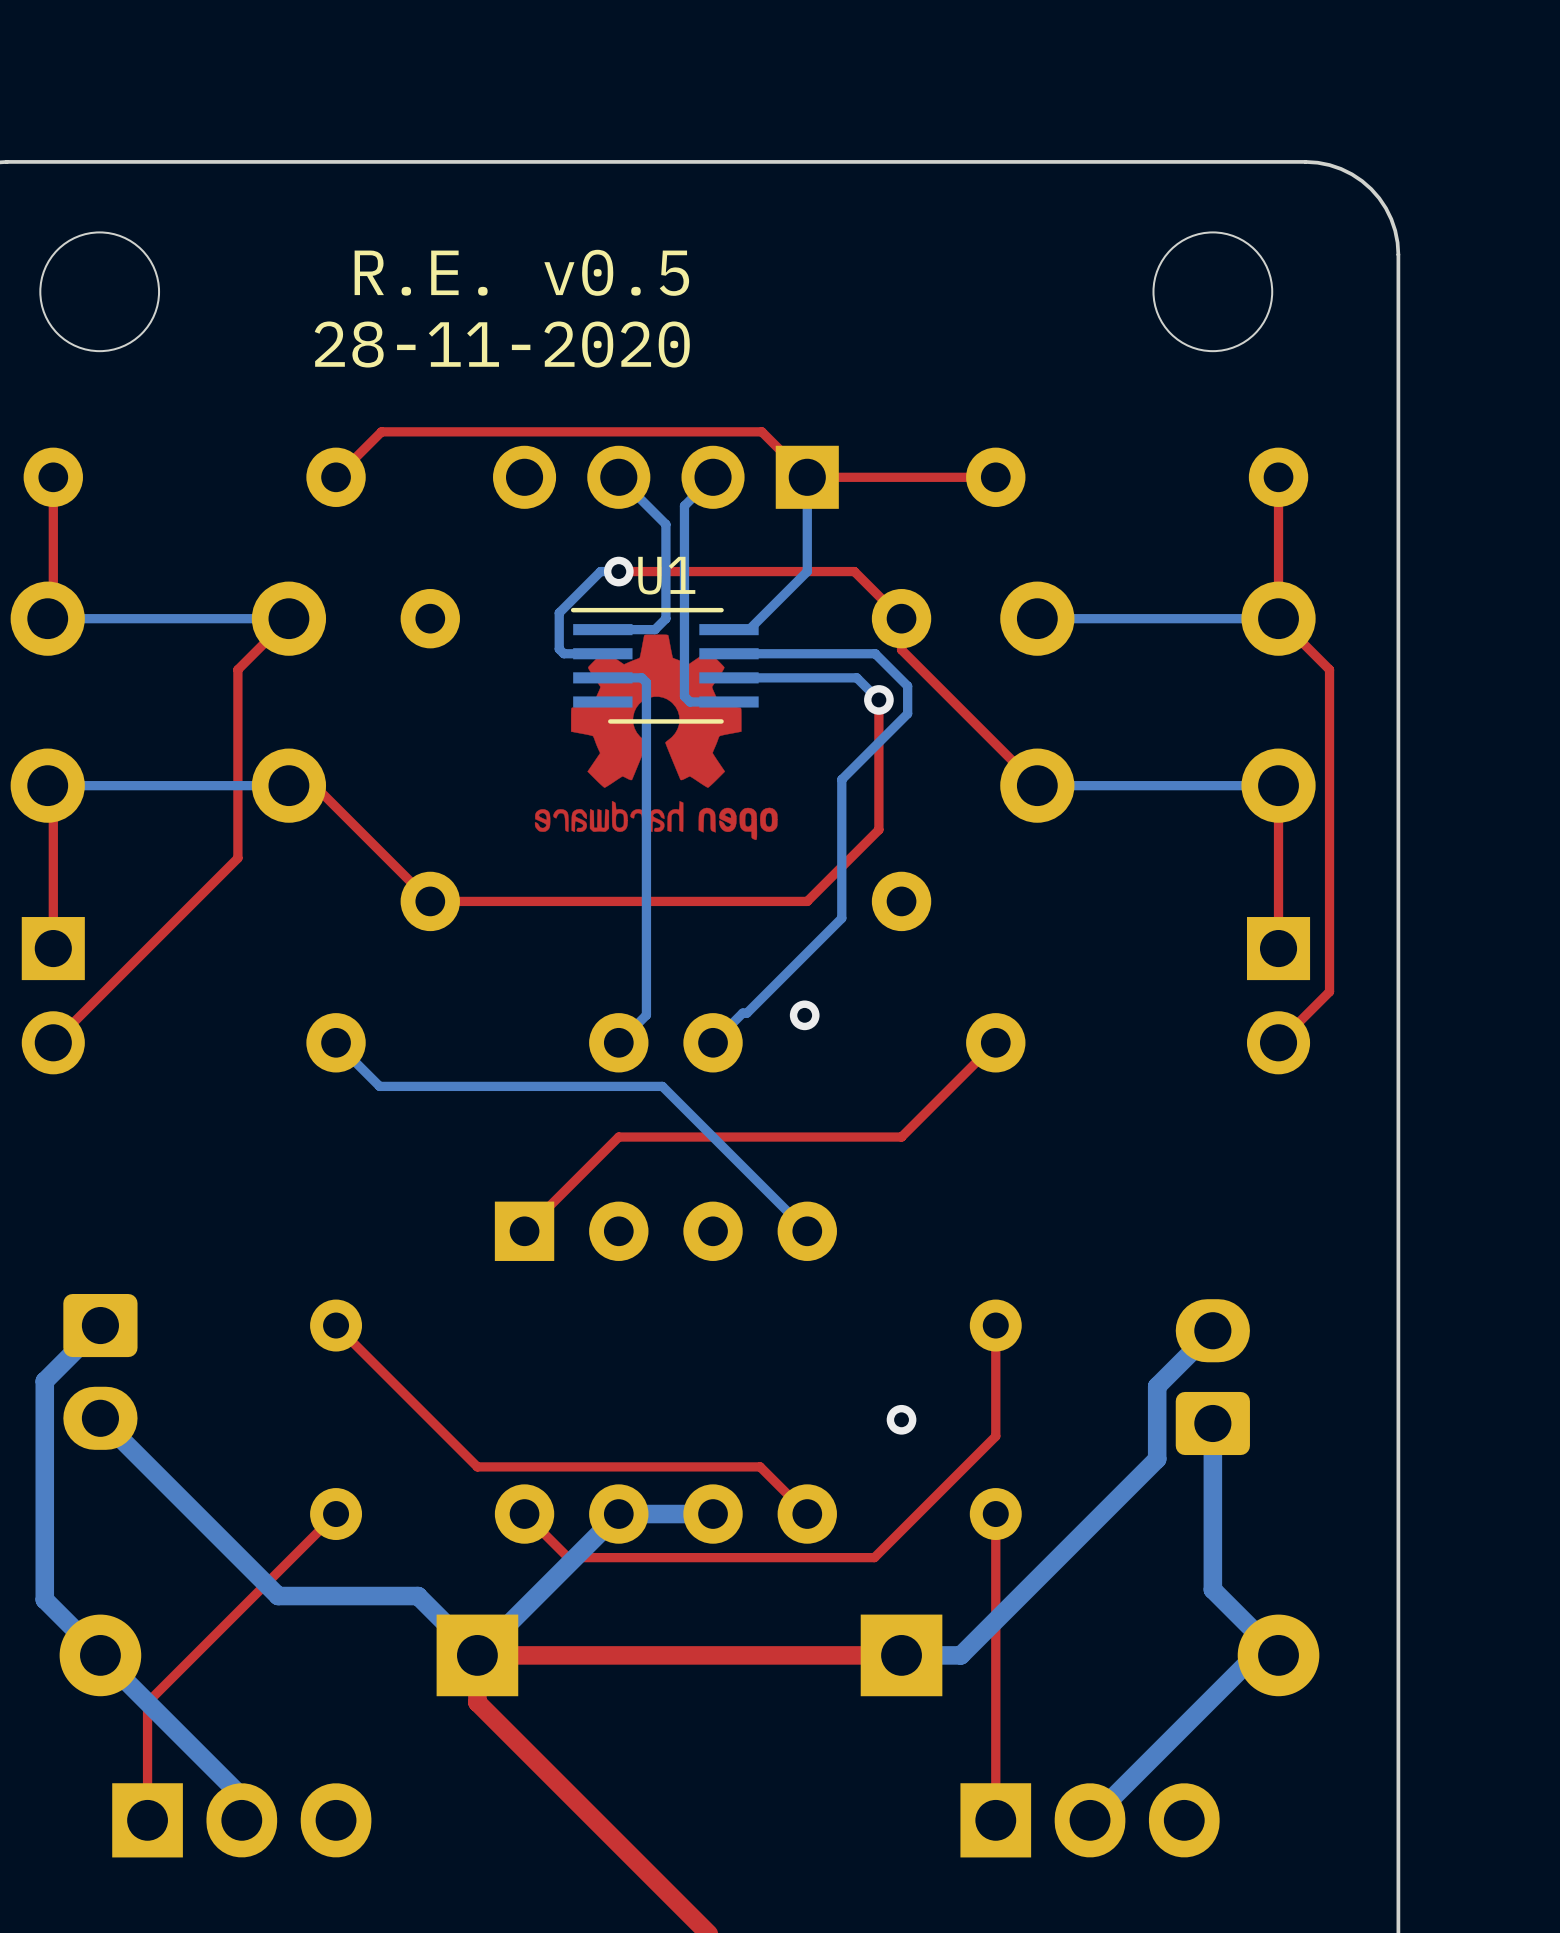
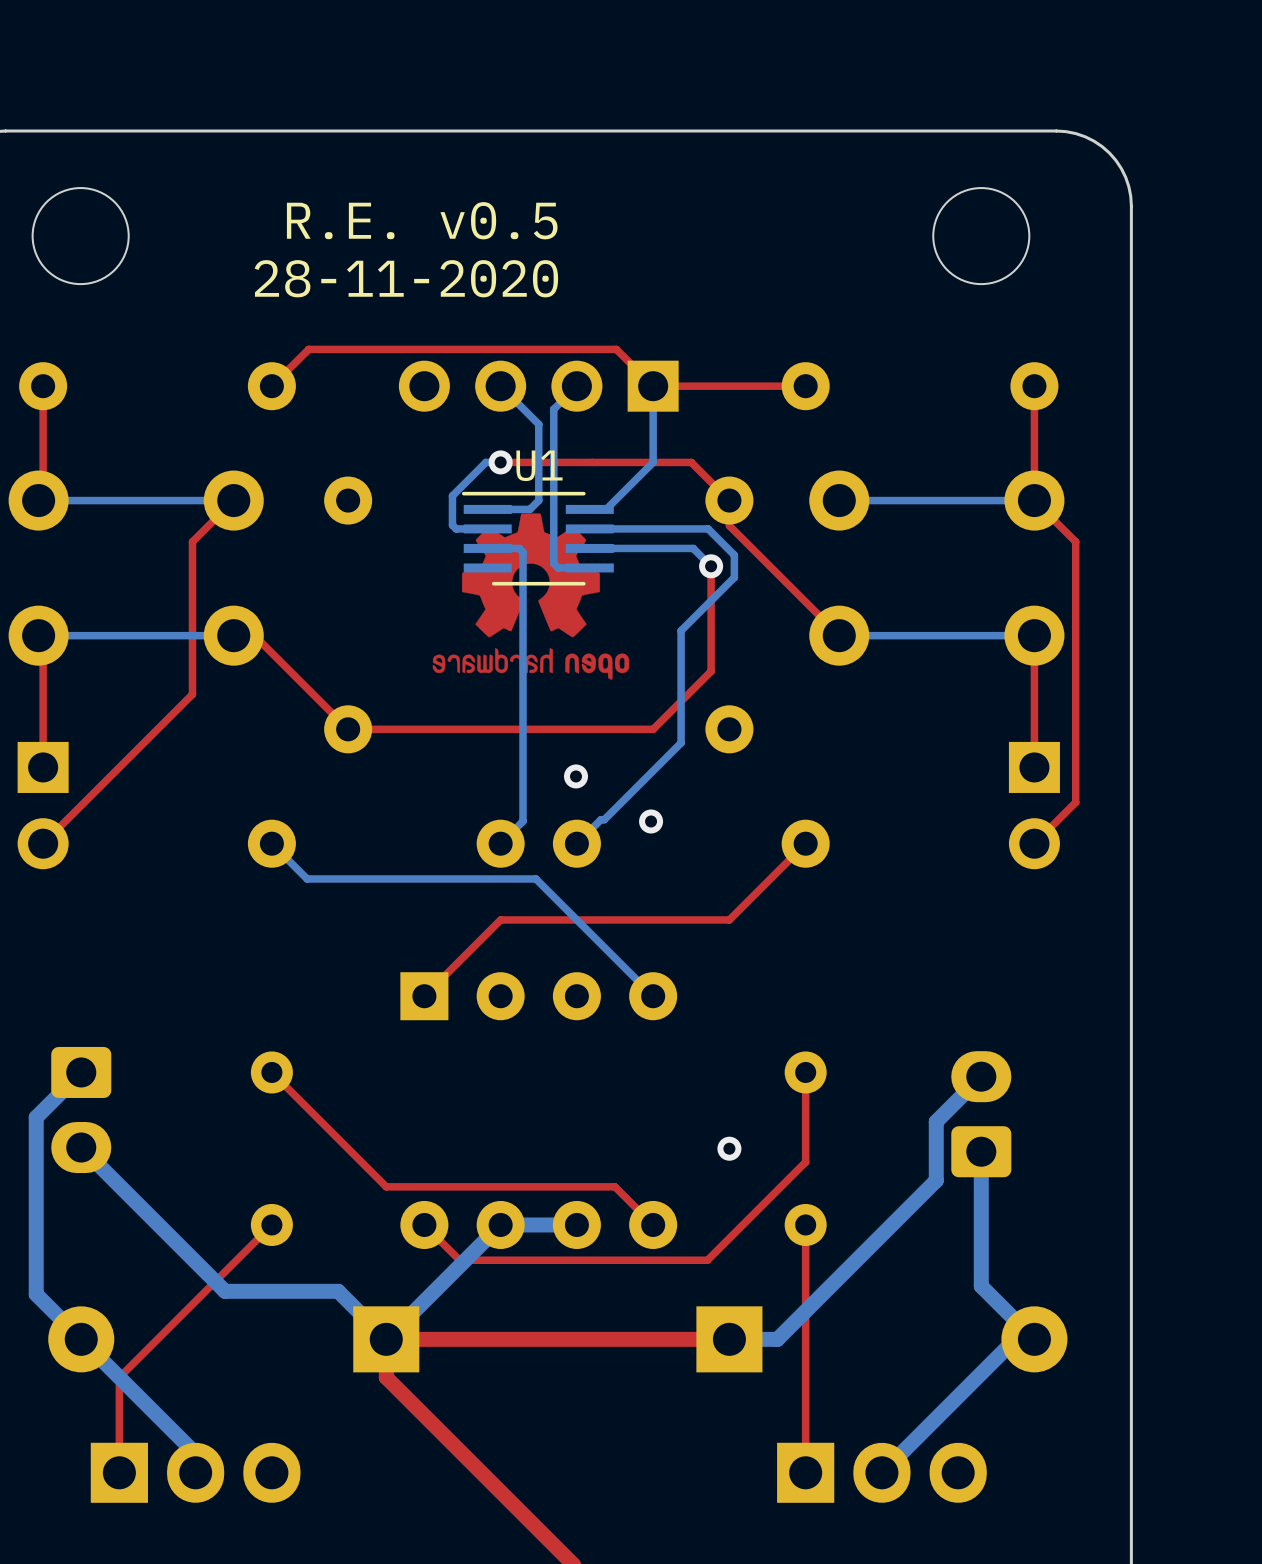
via: none -> (576, 776)

